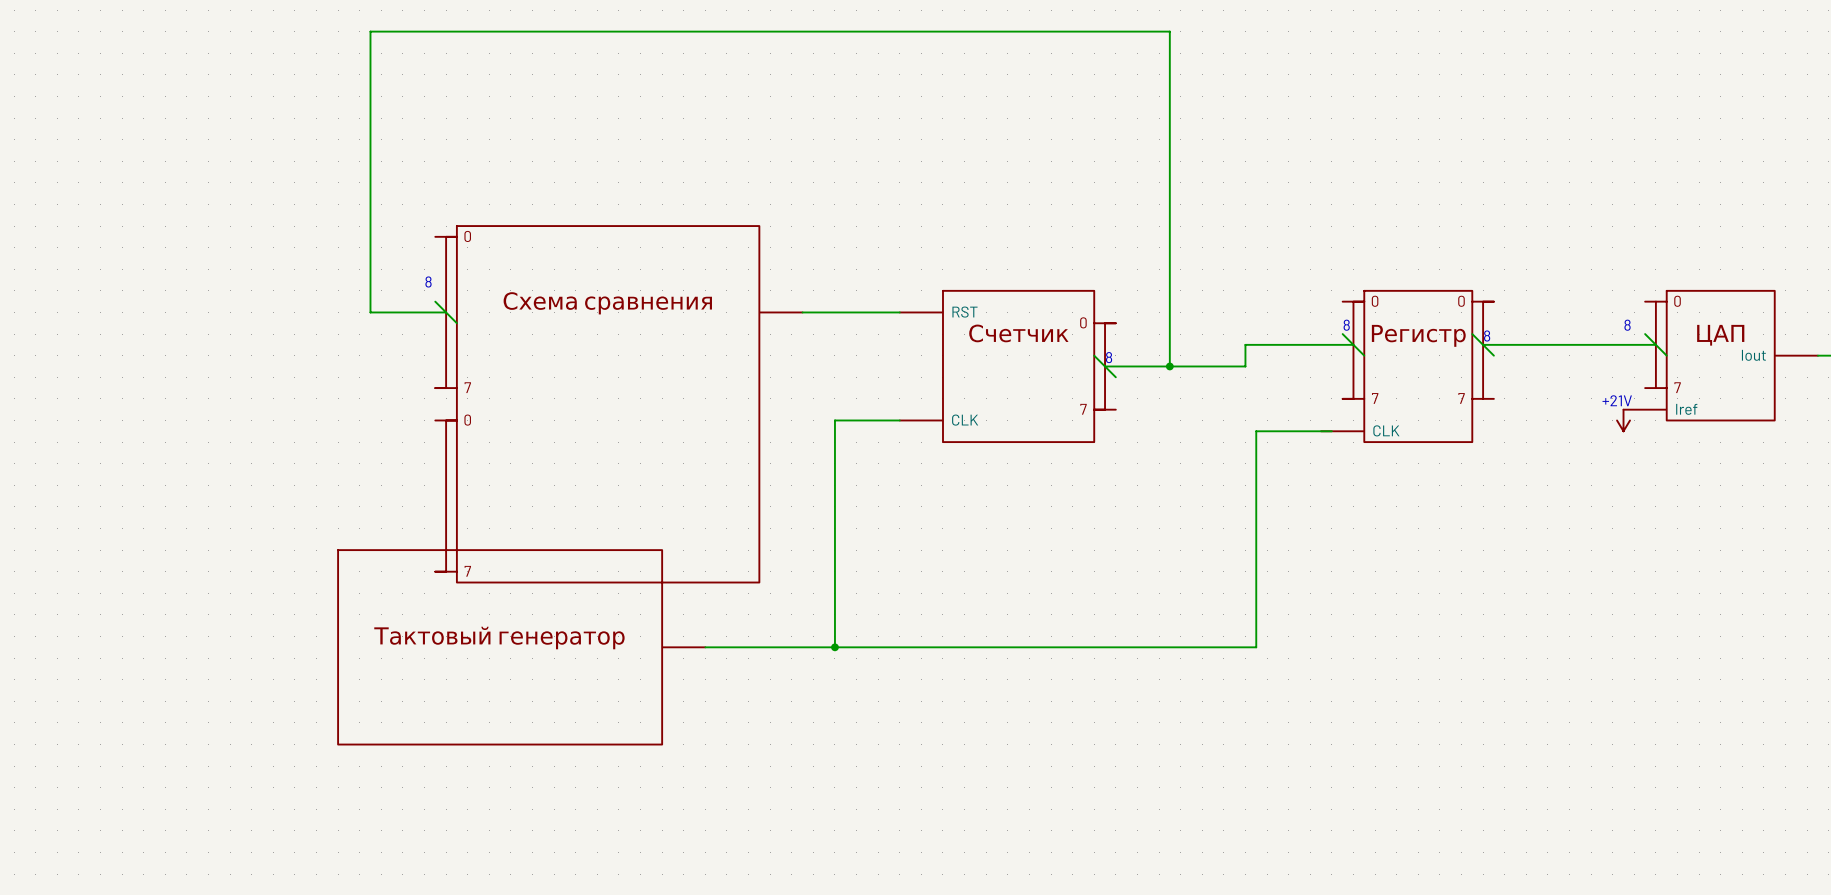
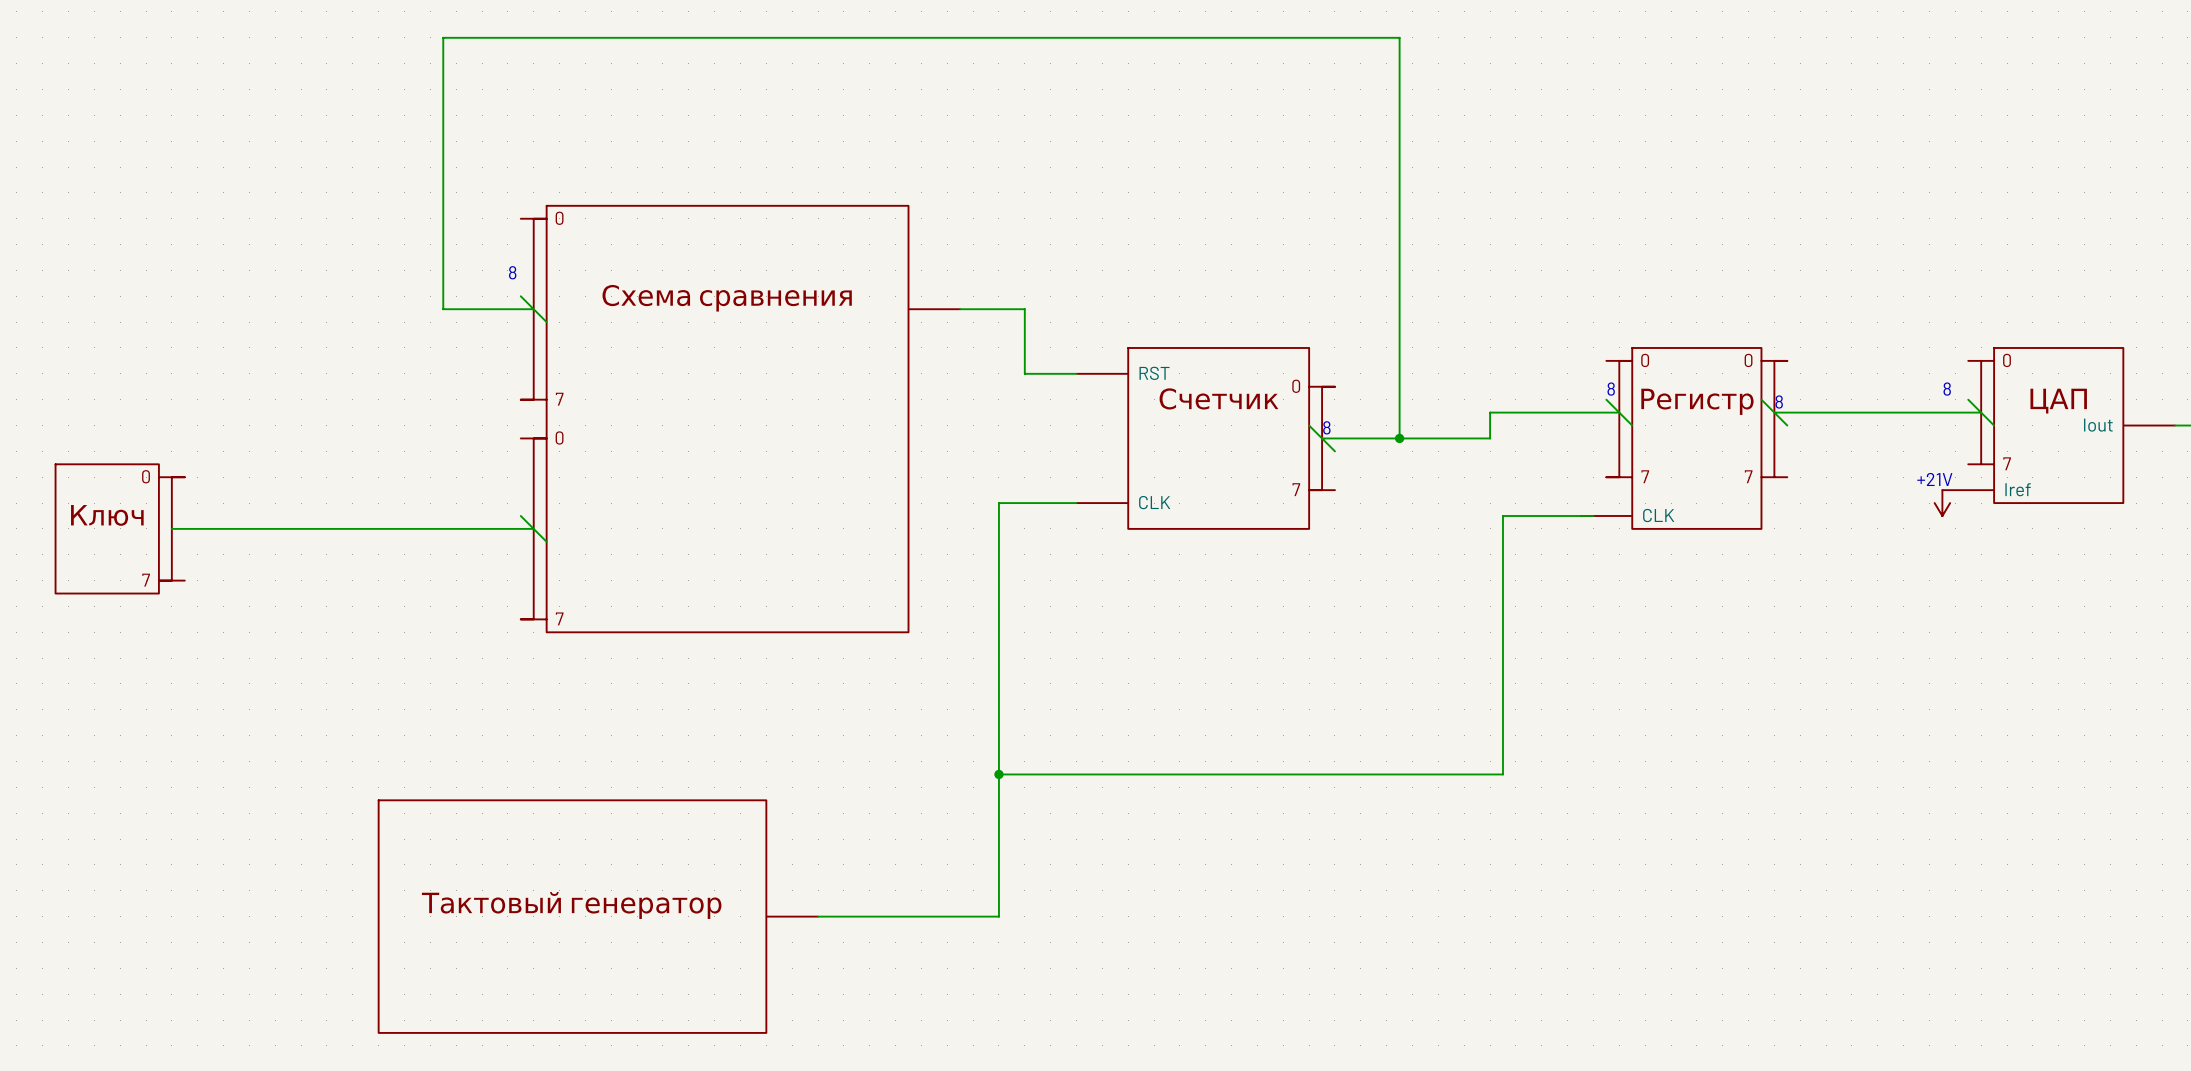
wire: (370, 258) (370, 312) (446, 312) -> (443, 309) (533, 309)
text position: 8 (428, 281) -> 8 (512, 272)
wire: (435, 301) (456, 323) -> (520, 296) (546, 322)
wire: (802, 312) (856, 312) -> (960, 309) (1024, 309) (1024, 373)
part position: (618, 404) -> (740, 419)
wire: none -> (520, 515) (546, 541)
part: none -> (120, 528)
wire: none -> (171, 528) (533, 528)
part position: (521, 647) -> (598, 916)
wire: (705, 647) (834, 647) -> (818, 916) (998, 916) (998, 774)

